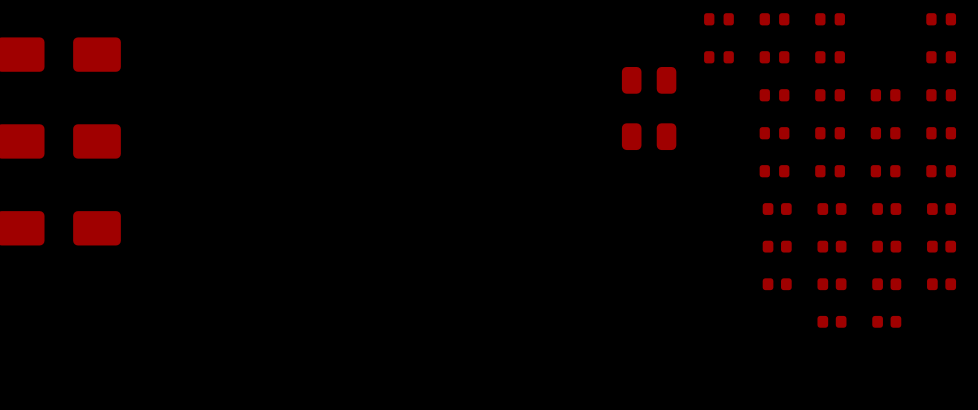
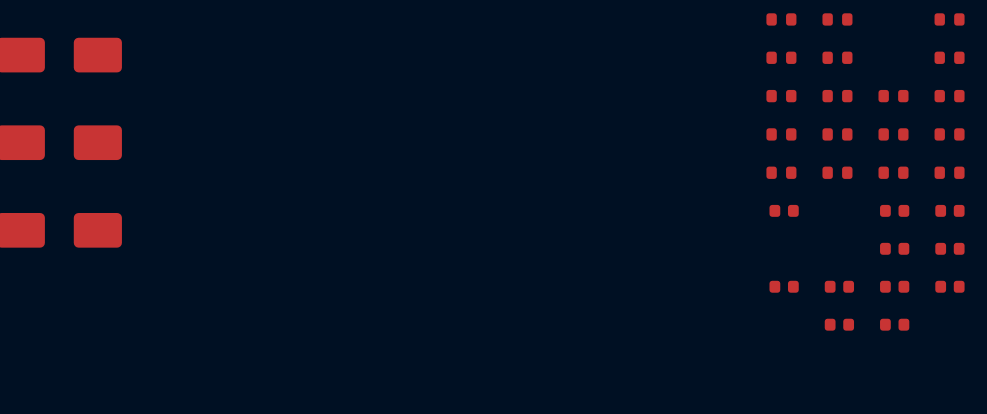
part: (718, 19) -> none
part: (718, 57) -> none
part: (649, 80) -> none
part: (649, 136) -> none
part: (831, 209) -> none
part: (777, 246) -> none
part: (831, 246) -> none

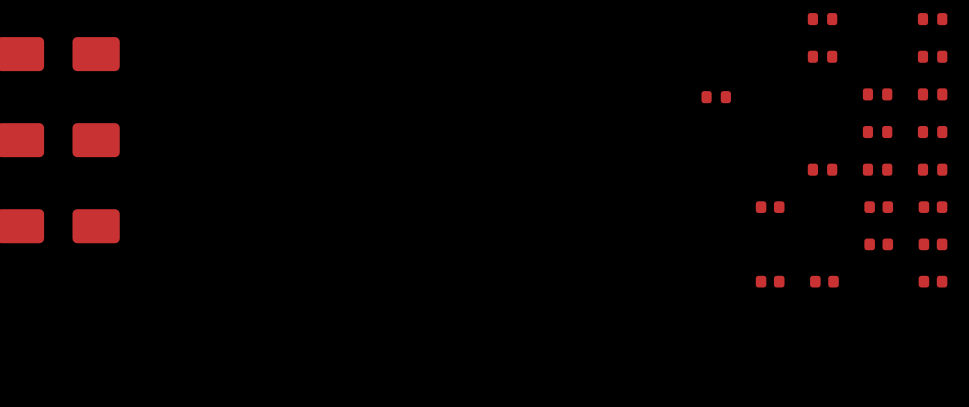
part: (781, 19) -> none
part: (781, 57) -> none
part: (781, 96) -> none
part: (837, 96) -> none
part: none -> (716, 97)
part: (781, 134) -> none
part: (837, 134) -> none
part: (781, 172) -> none
part: (894, 286) -> none
part: (839, 324) -> none
part: (894, 324) -> none

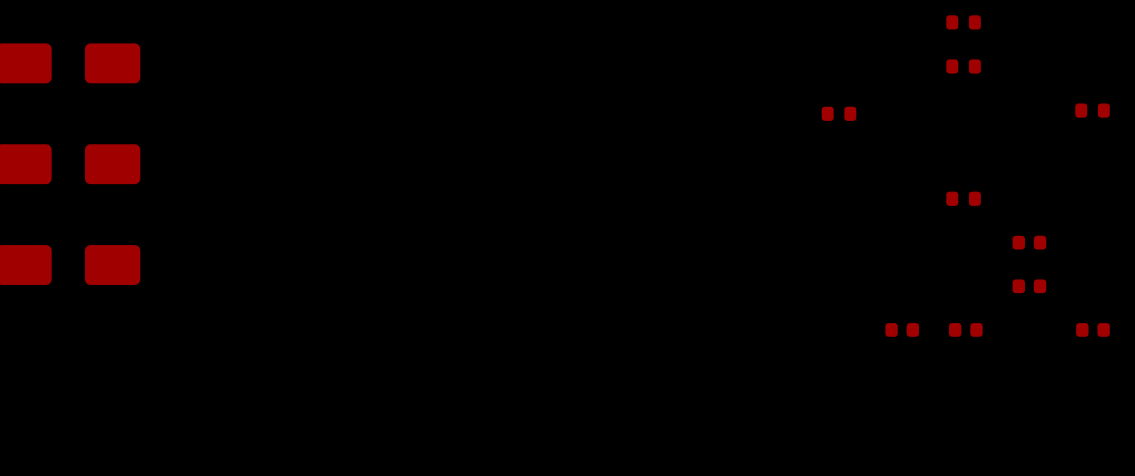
part: (932, 19) -> none
part: (932, 56) -> none
part: (877, 94) -> none
part: (877, 132) -> none
part: (932, 132) -> none
part: (877, 169) -> none
part: (932, 169) -> none
part: (770, 207) -> none
part: (933, 207) -> none
part: (933, 244) -> none

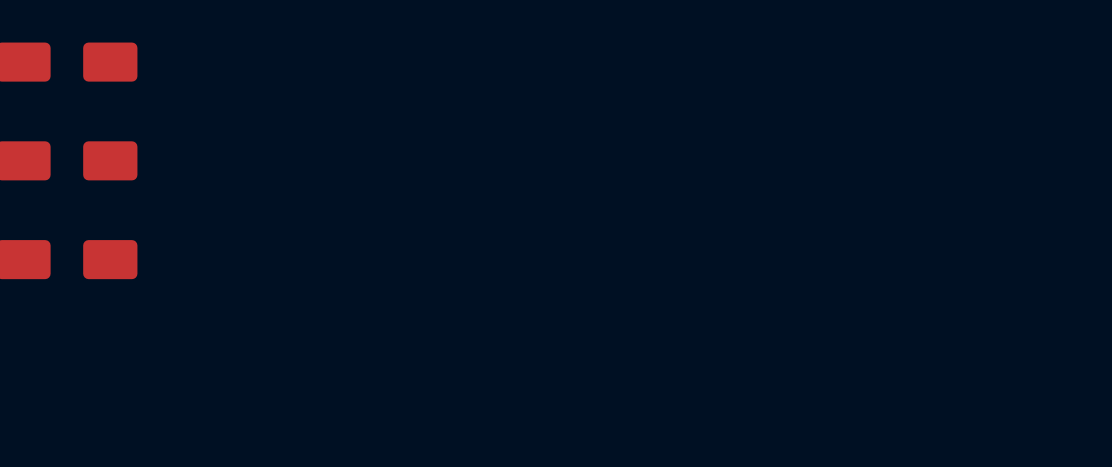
part: (963, 22) -> none
part: (963, 66) -> none
part: (1092, 110) -> none
part: (839, 113) -> none
part: (963, 198) -> none
part: (1029, 242) -> none
part: (1029, 286) -> none
part: (902, 329) -> none
part: (965, 329) -> none
part: (1092, 329) -> none

